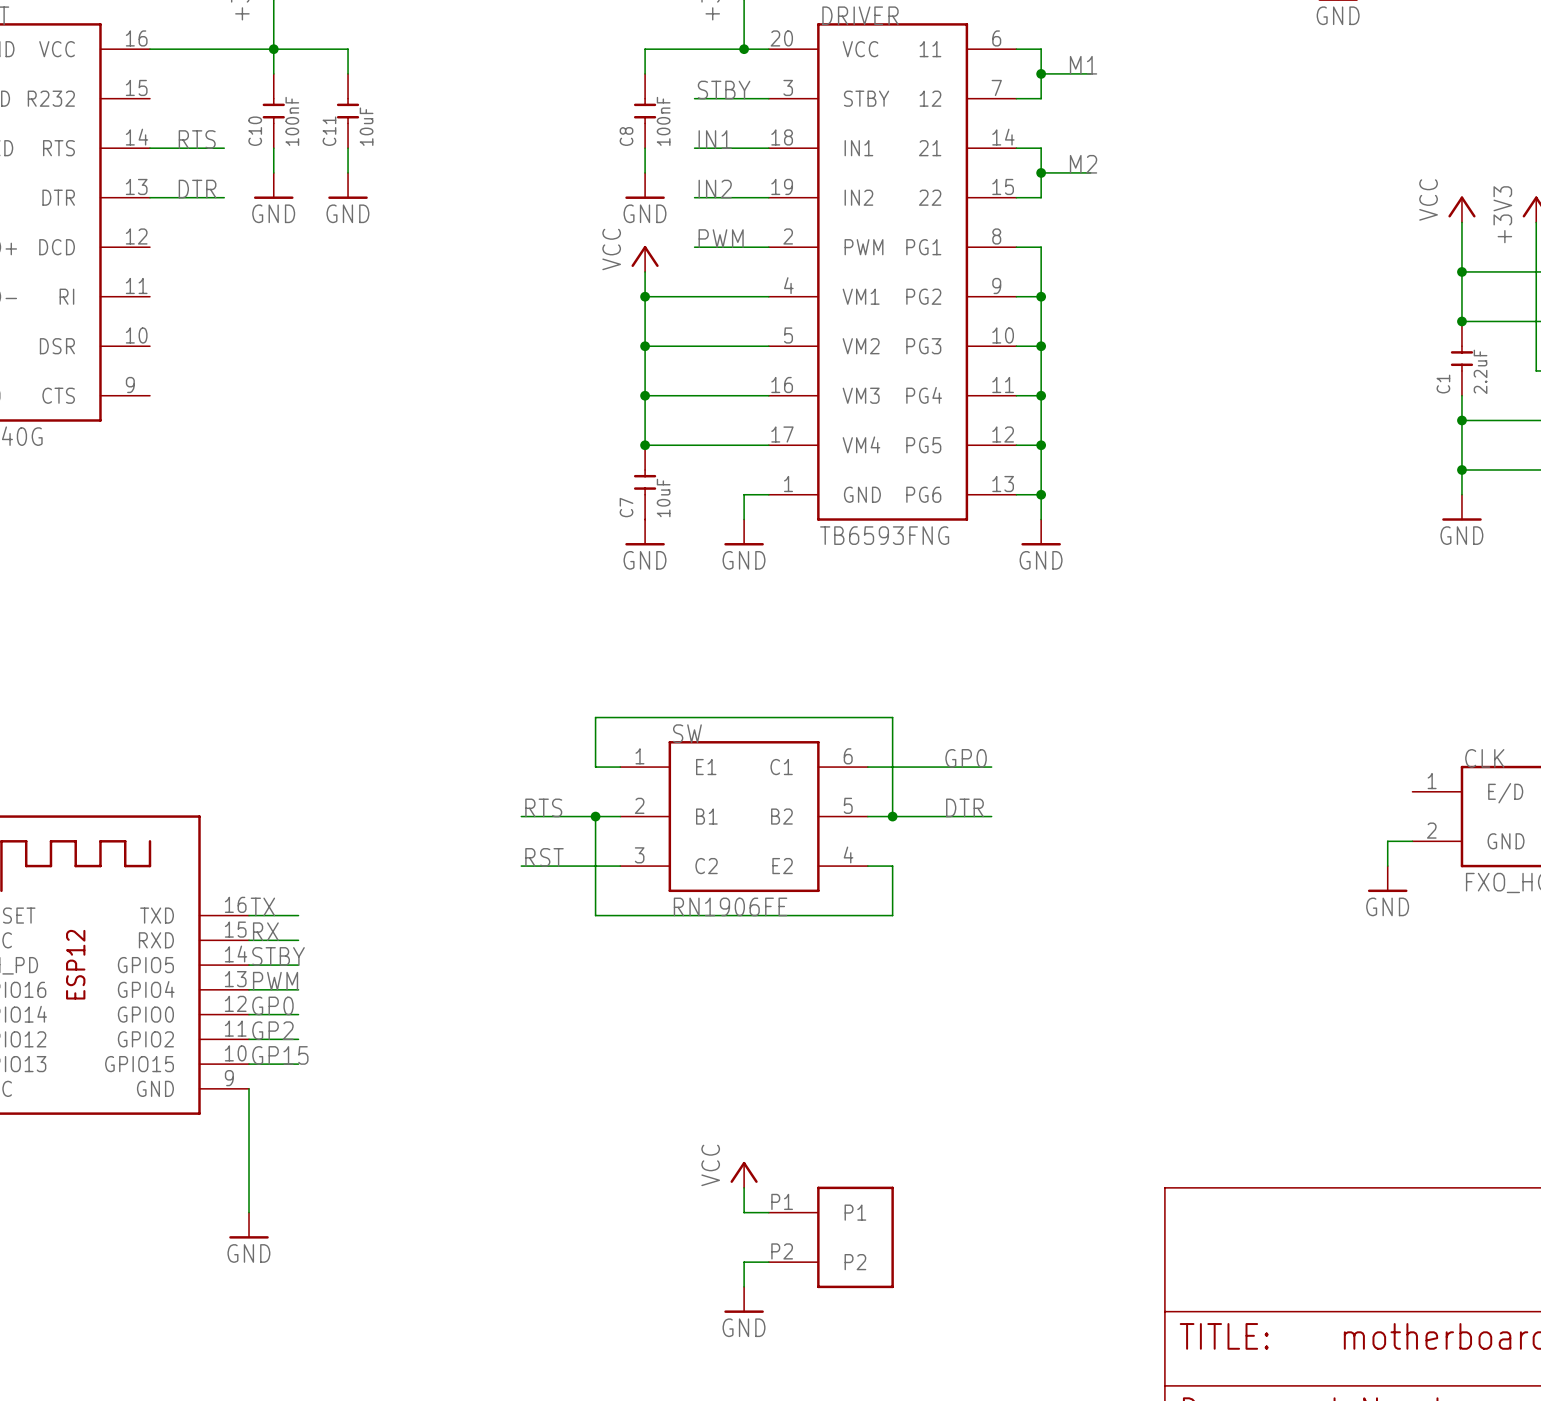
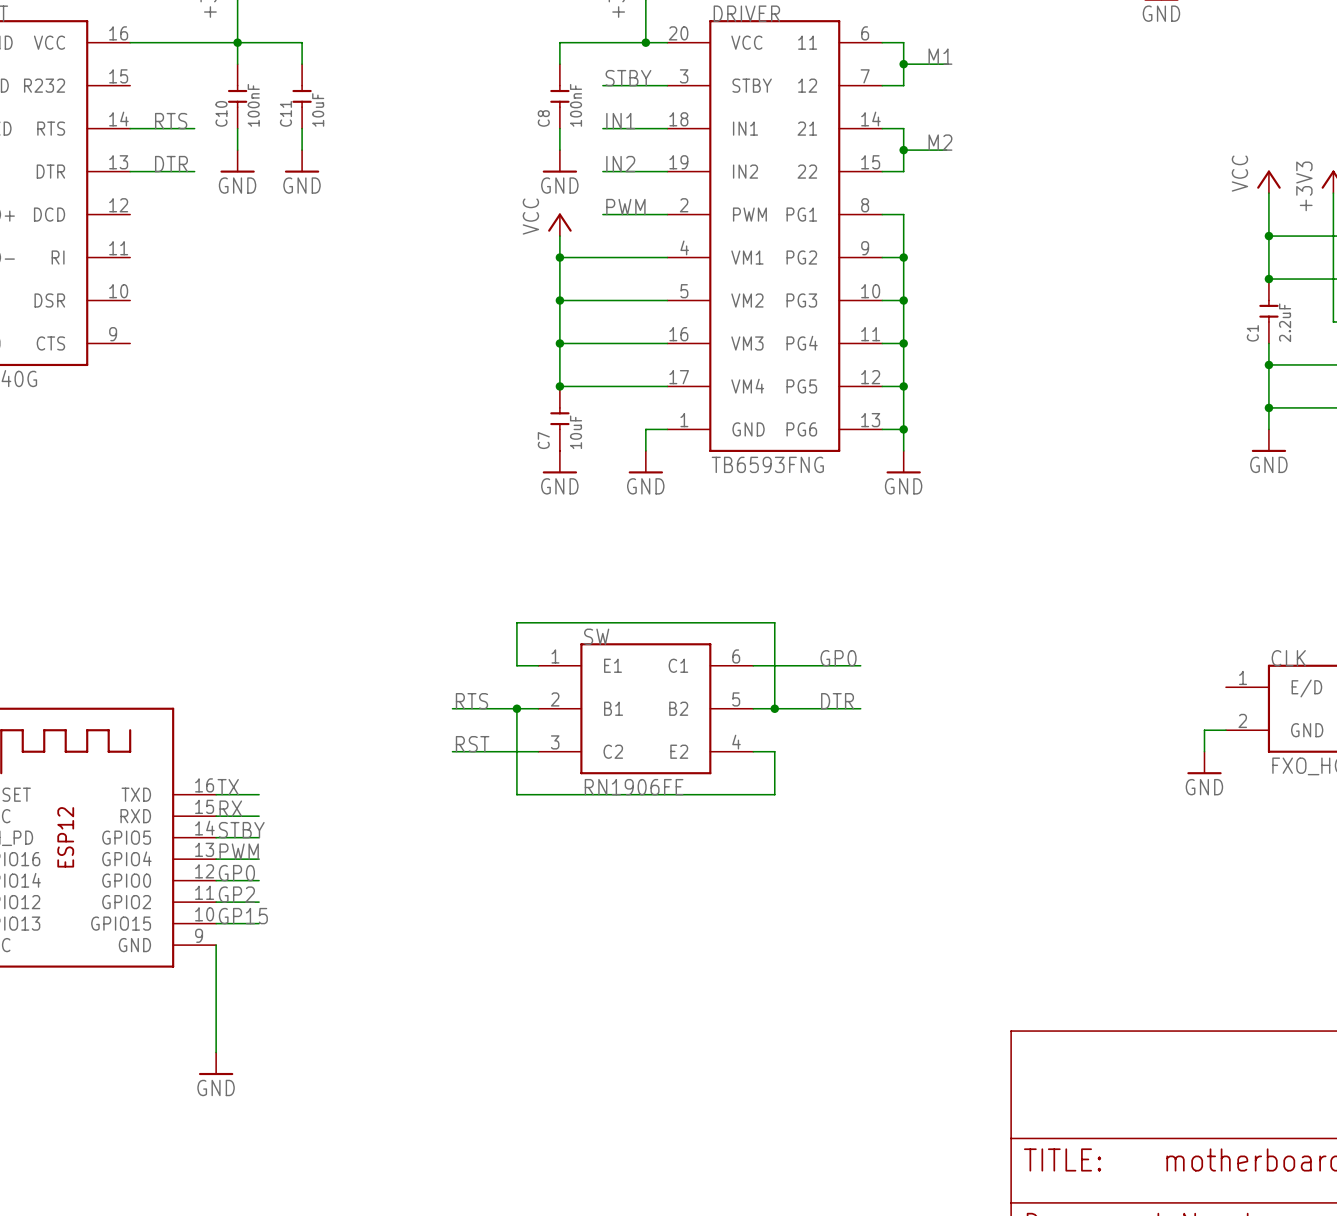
power symbol: VCC (744, 1174) -> none
wire: (744, 1187) (744, 1212) (768, 1212) -> none
part: (831, 1237) -> none
wire: (768, 1262) (744, 1262) (744, 1286) -> none
power symbol: GND (744, 1299) -> none

